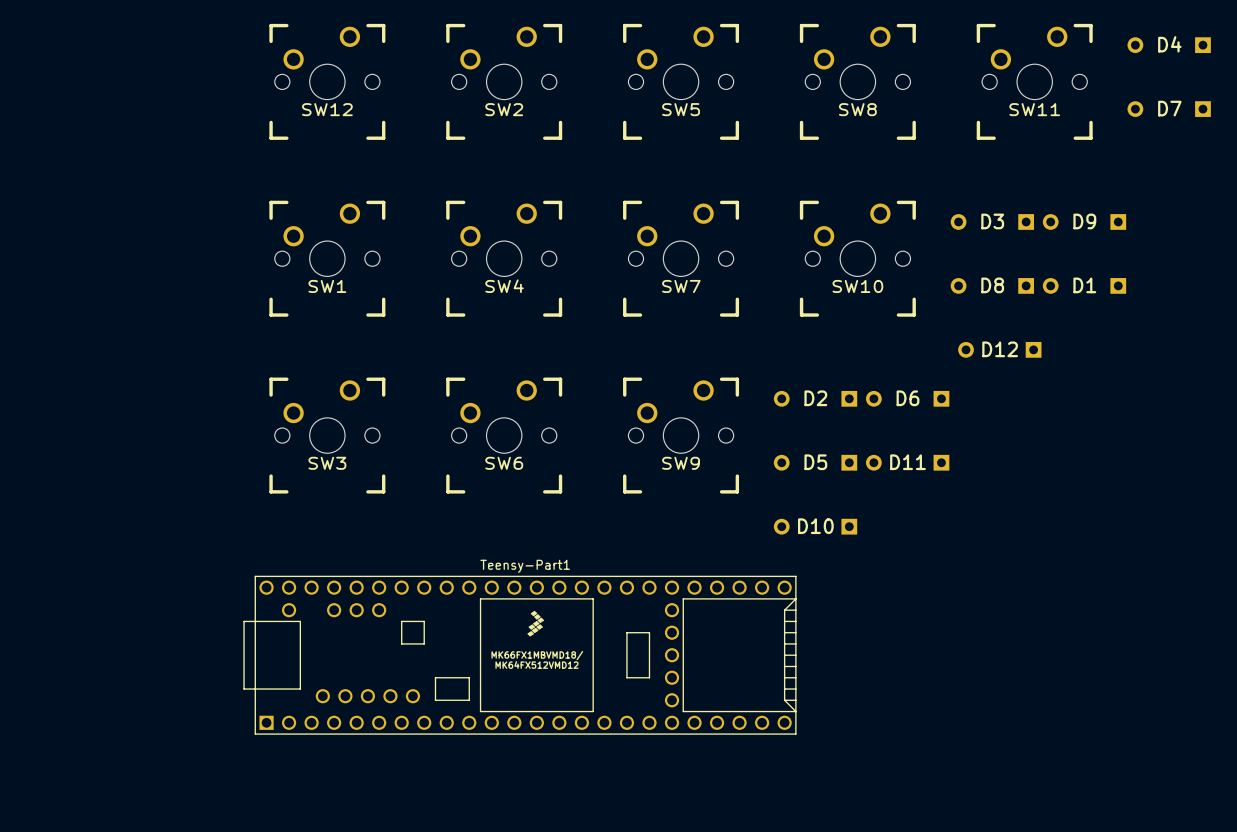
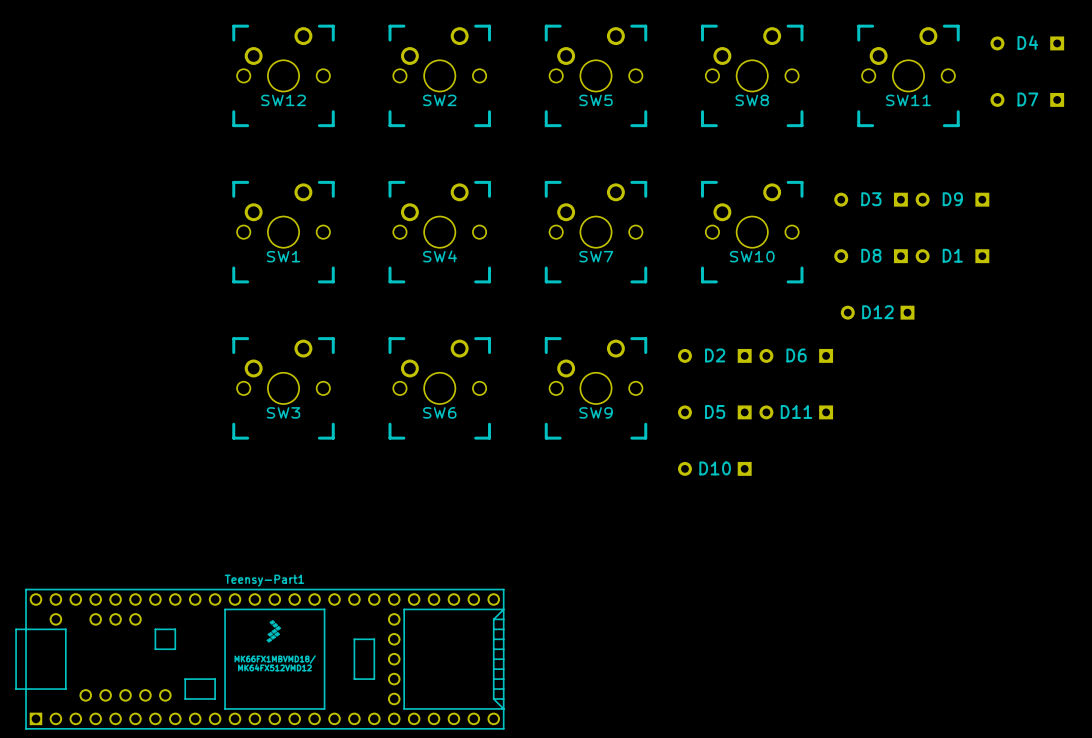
Teensy-Part1 position: (519, 655) -> (259, 659)

